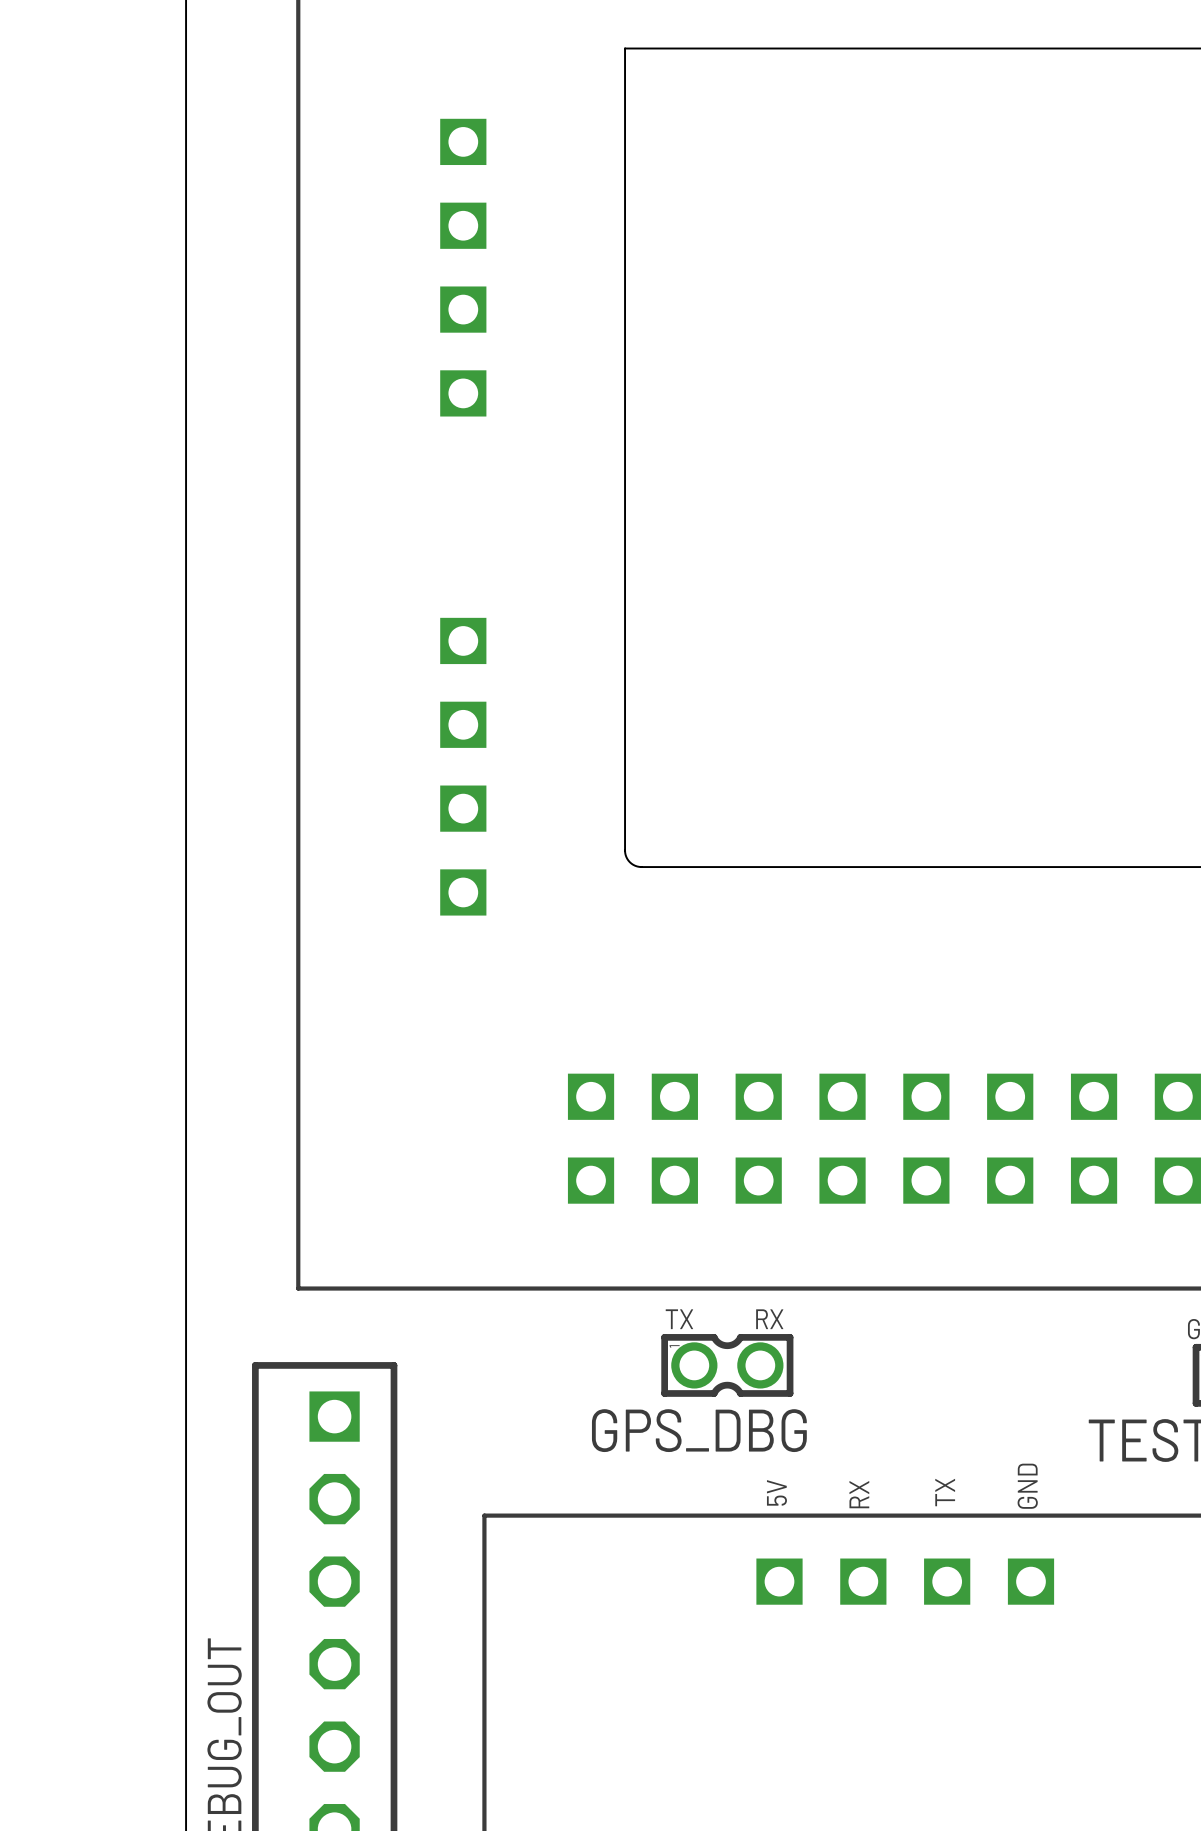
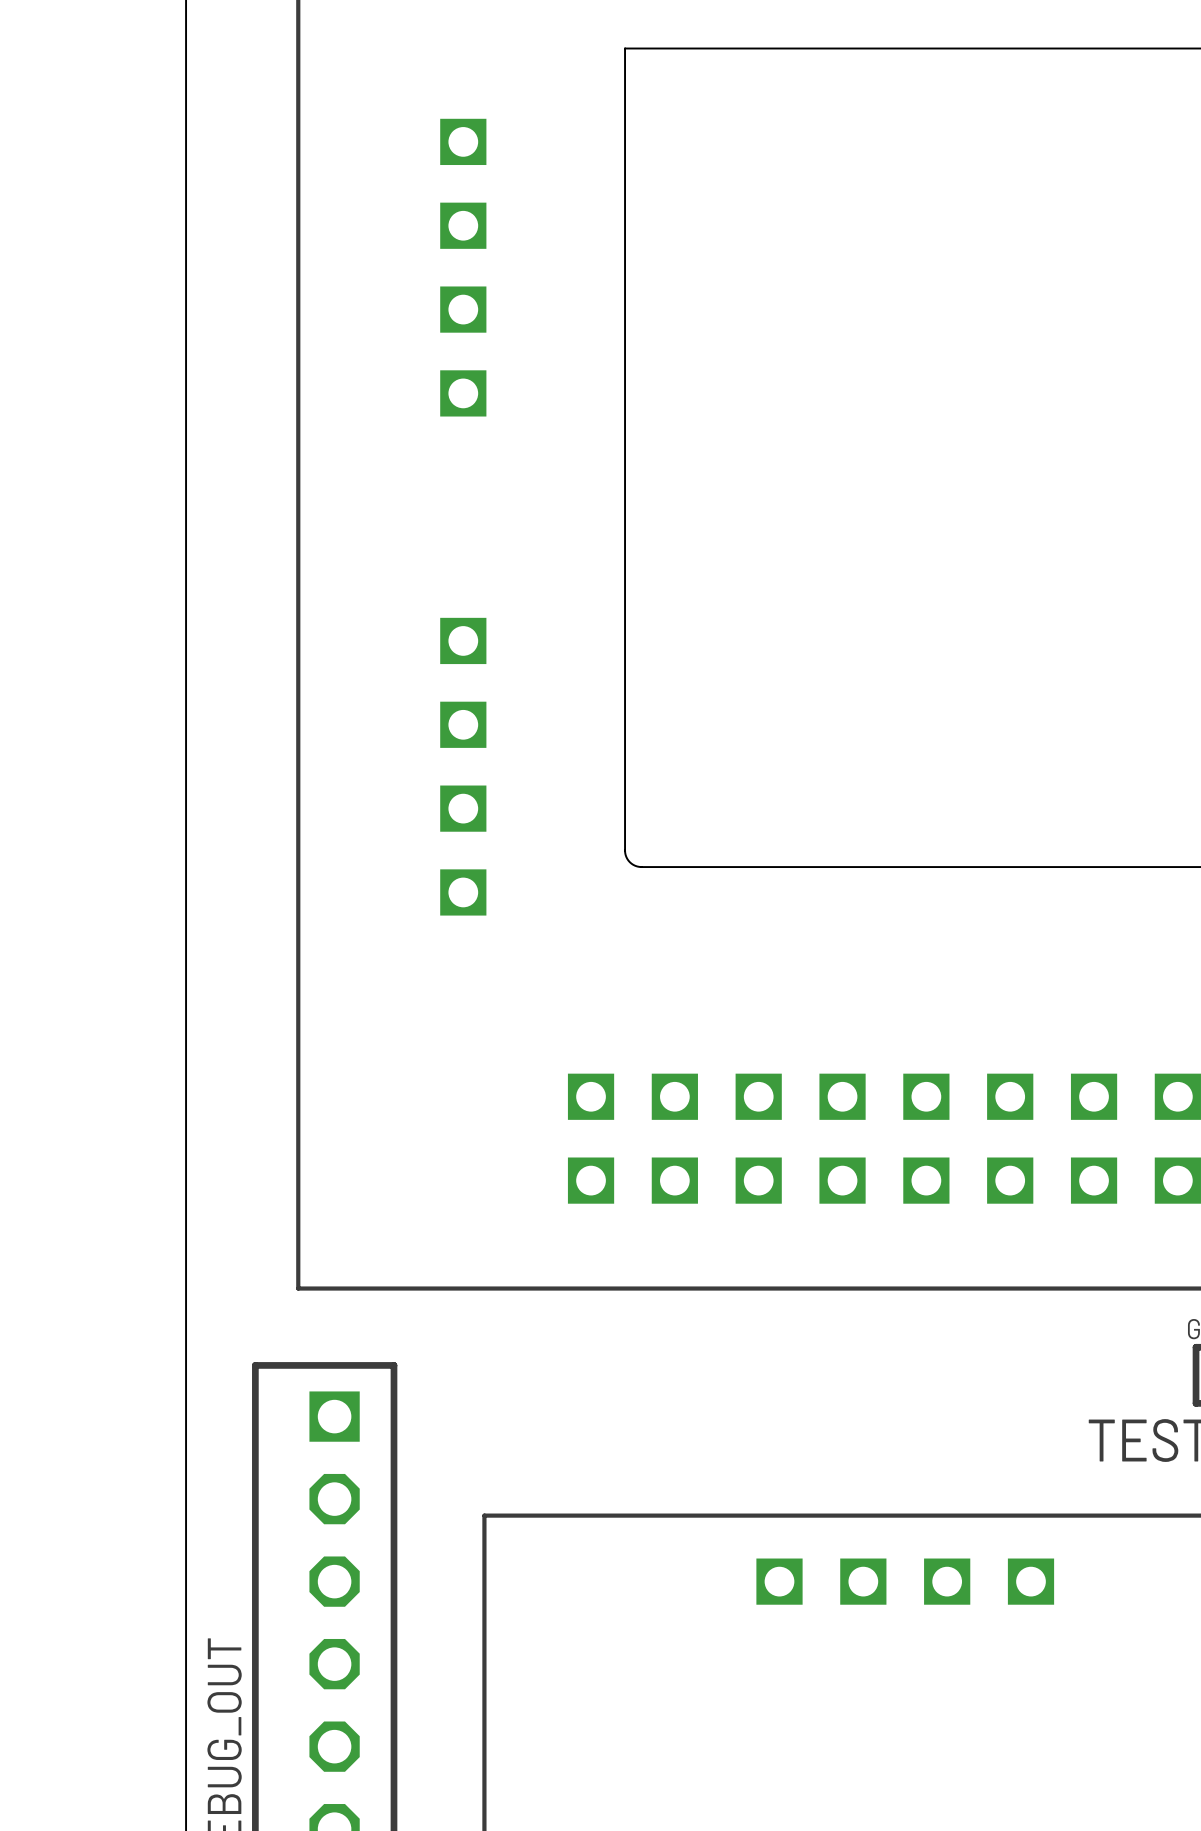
text: TX (679, 1319) -> none
text: RX (769, 1319) -> none
GPS_DBG: (727, 1365) -> none
text: GND (1027, 1486) -> none
text: 5V (776, 1492) -> none
text: TX (945, 1492) -> none
text: RX (859, 1494) -> none

